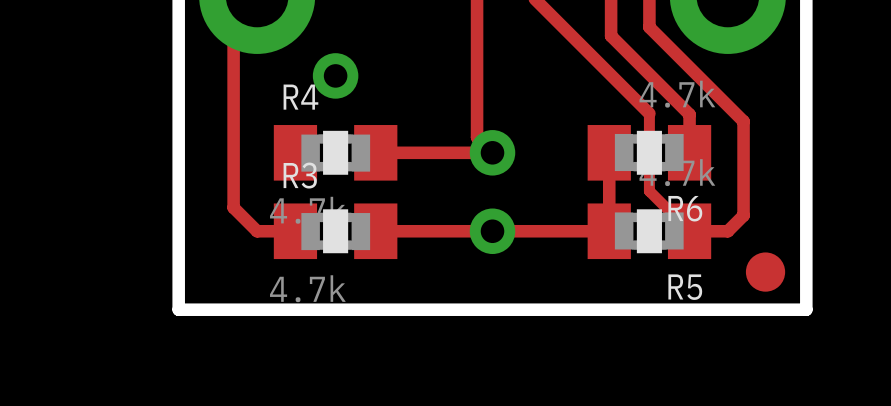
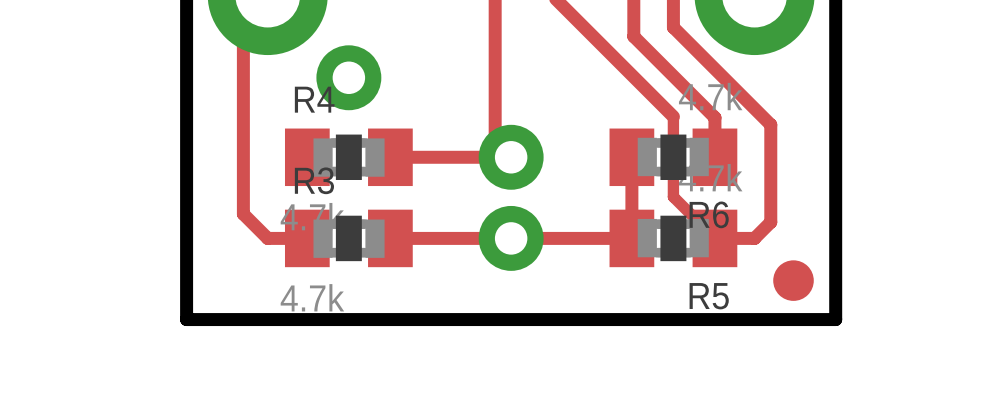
via size: [312, 53, 359, 99] -> [316, 45, 382, 111]
via size: [469, 130, 516, 176] -> [478, 124, 544, 190]
via size: [469, 208, 516, 255] -> [478, 205, 544, 271]

